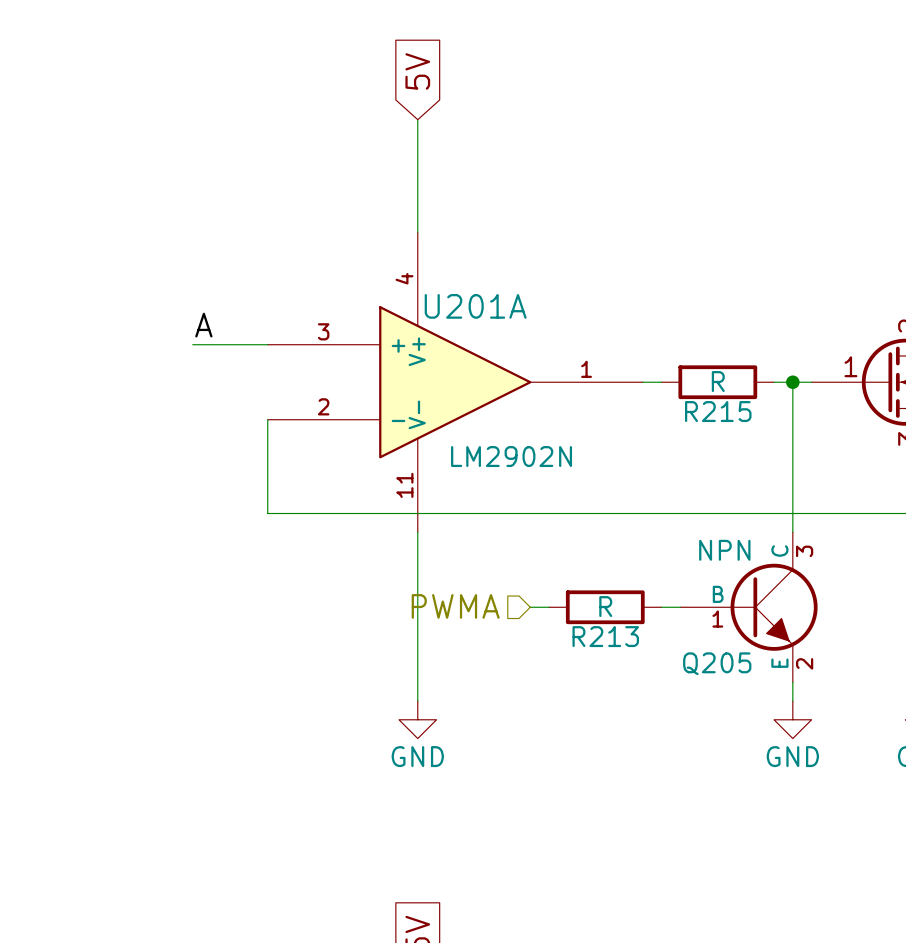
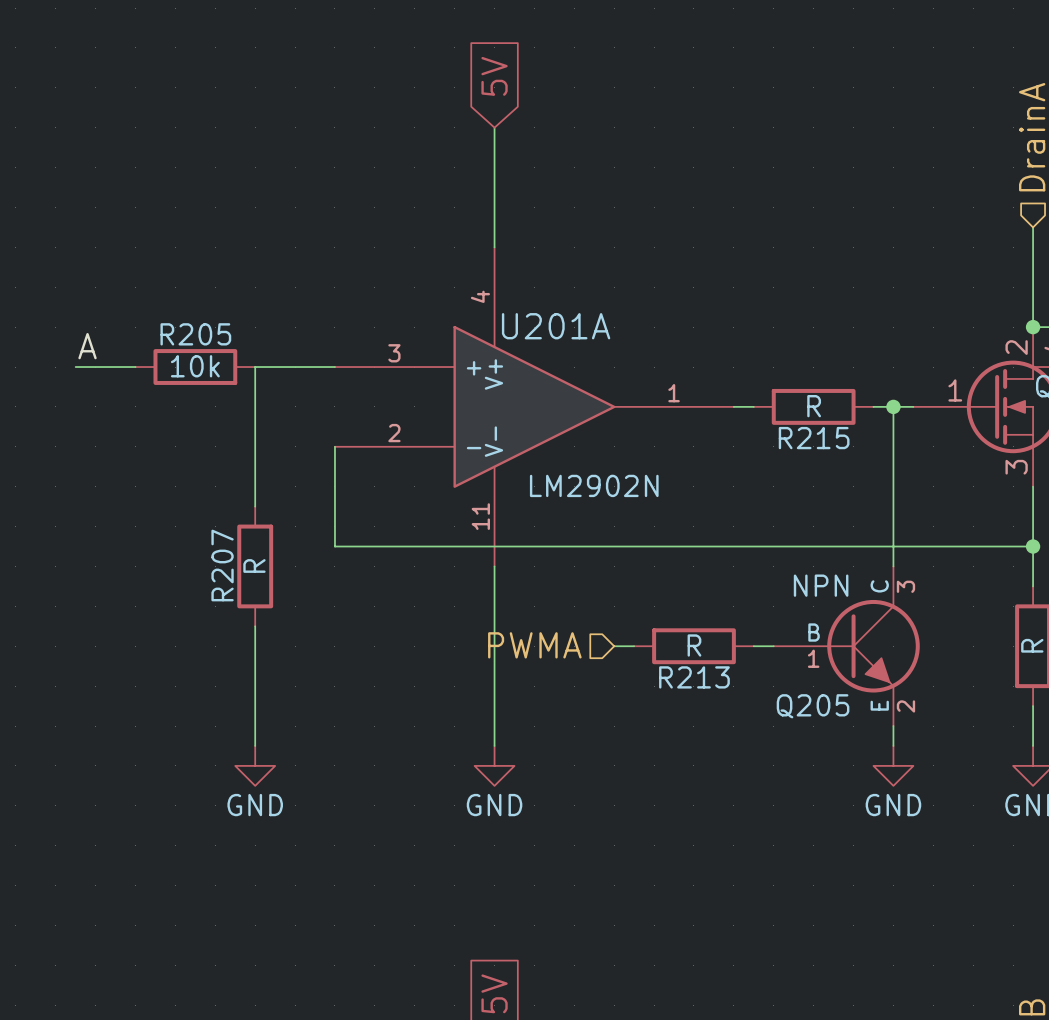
label position: A (203, 325) -> A (87, 346)
wire: none -> (75, 367) (135, 367)
R205: none -> 10k (195, 367)
wire: none -> (255, 367) (255, 506)
R207: none -> R (255, 566)
wire: none -> (255, 626) (255, 745)
power symbol: none -> GND (255, 765)

